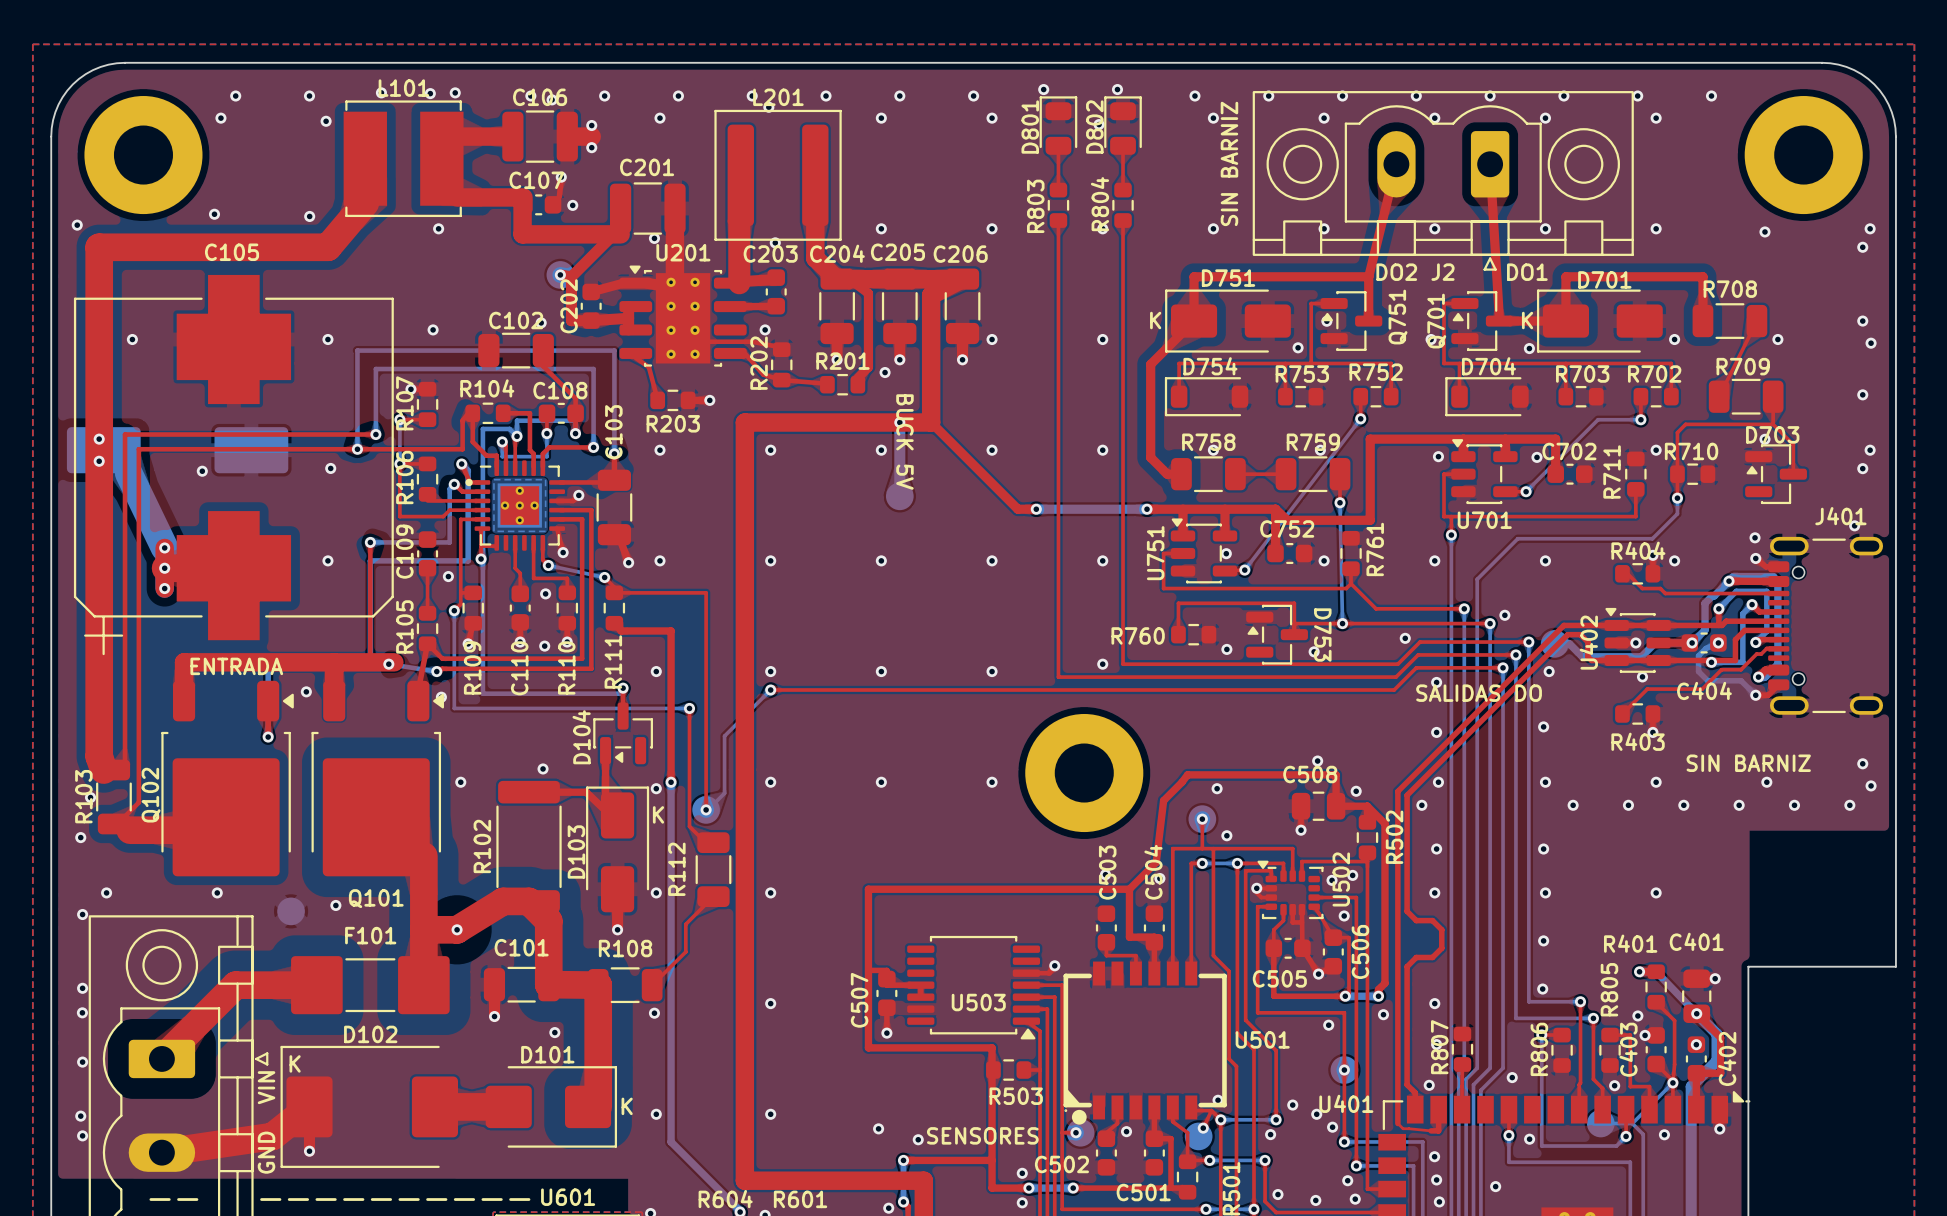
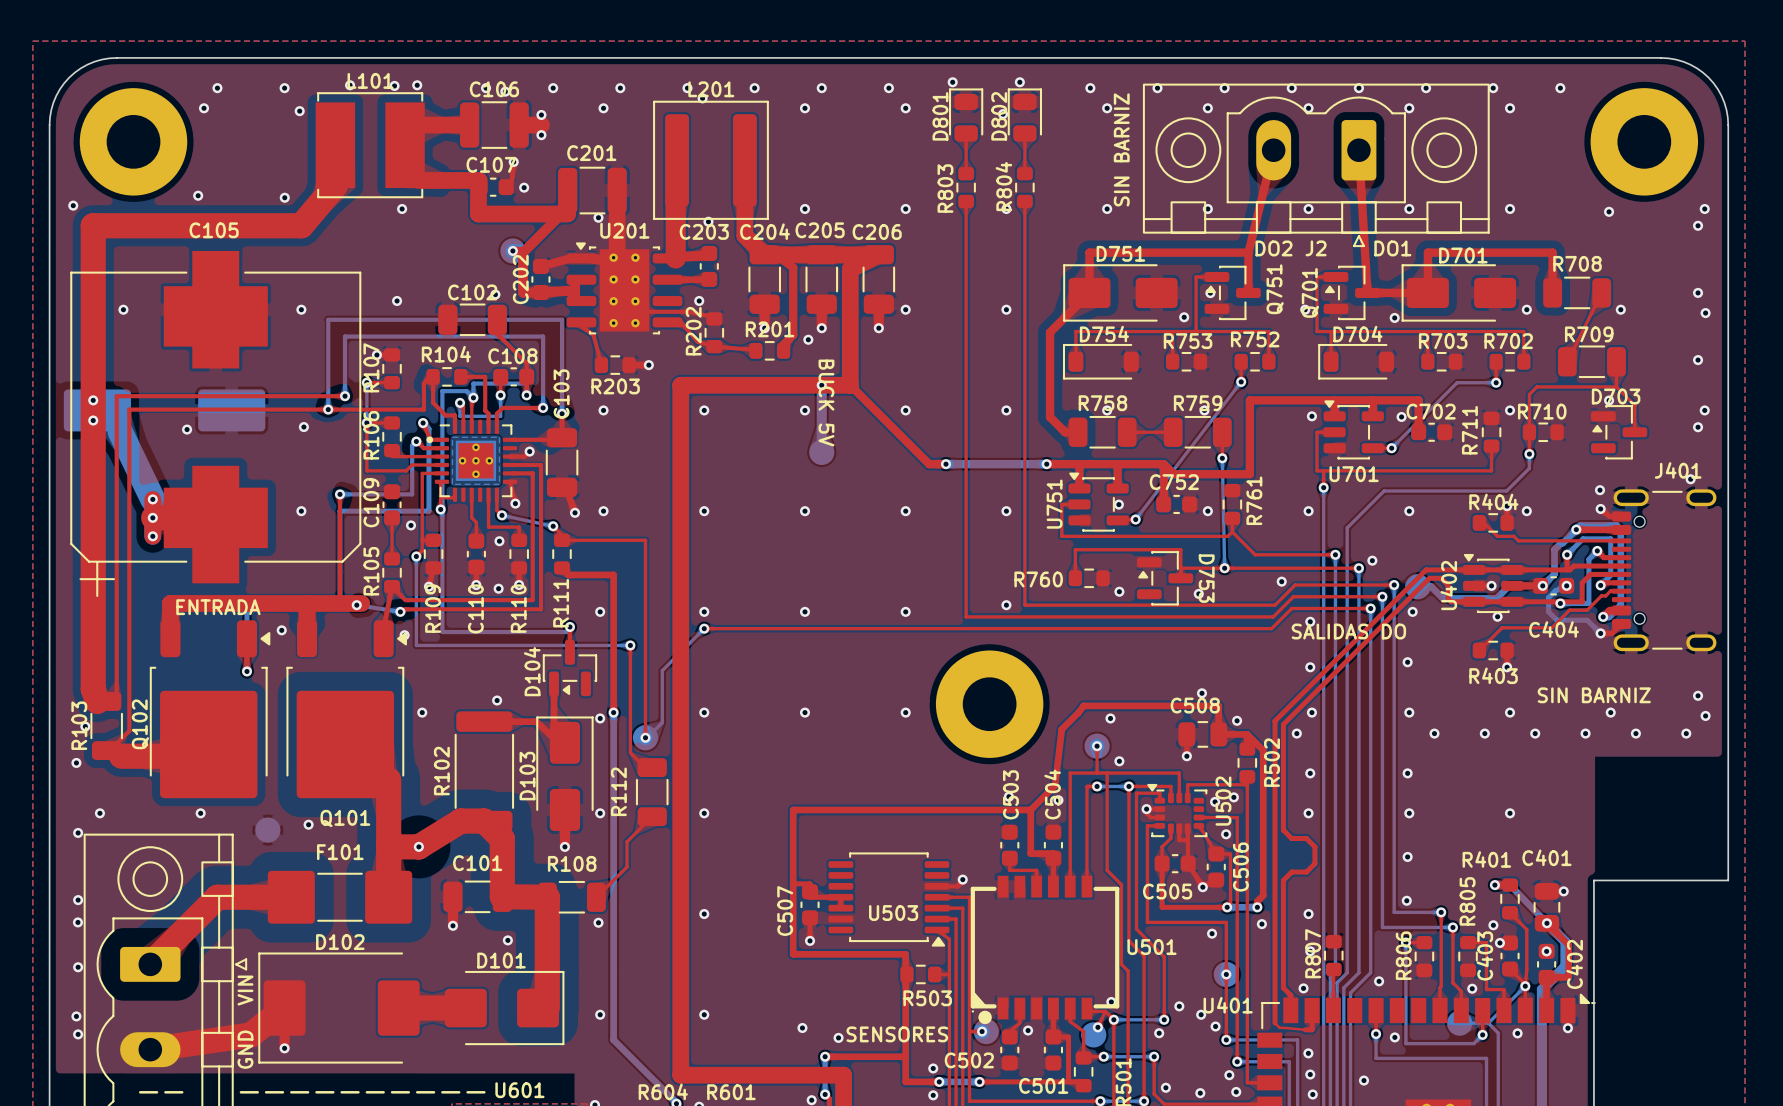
text: K (1155, 320) -> none
text: K (1527, 320) -> none
text: K (658, 814) -> none
text: K (295, 1063) -> none
text: K (627, 1106) -> none

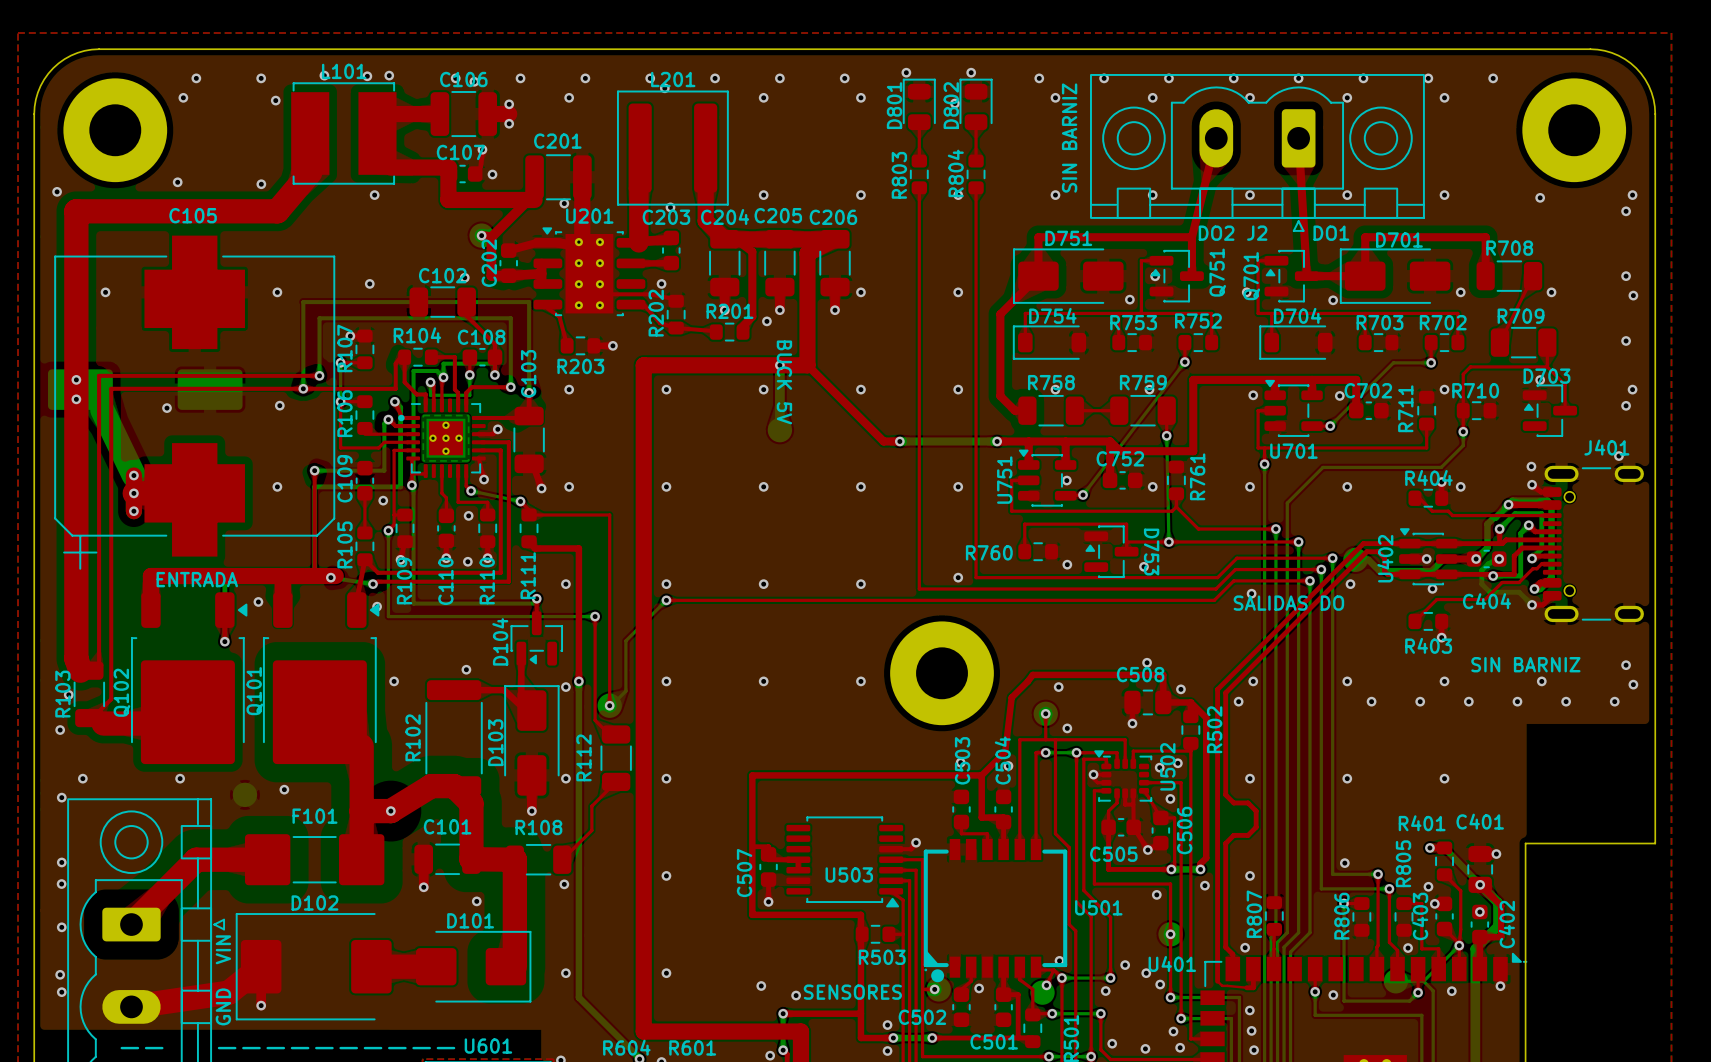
via: (1372, 560) -> none
via: (1281, 581) -> none
via: (1407, 662) -> none
via: (1310, 667) -> none
via: (1310, 773) -> none
via: (1407, 773) -> none
Q101 name rotation: 0° (345, 818) -> 90° counterclockwise (254, 691)
Q101 name position: Q101 (345, 818) -> Q101 (254, 691)
via: (1407, 856) -> none
via: (1310, 951) -> none
via: (1379, 981) -> none
via: (1363, 1080) -> none

